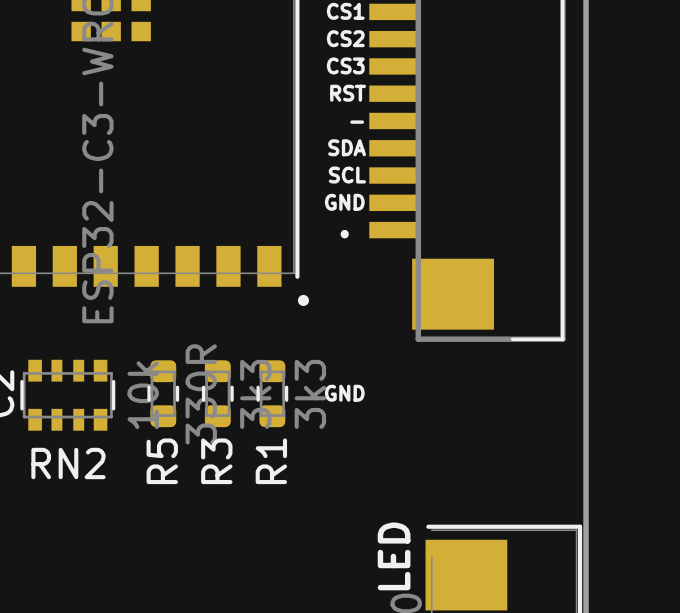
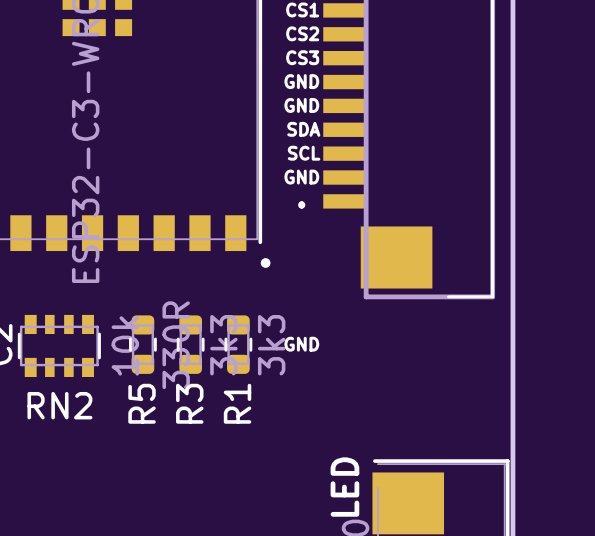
text: RST (348, 93) -> GND (301, 81)
text: - (357, 122) -> GND (301, 105)

